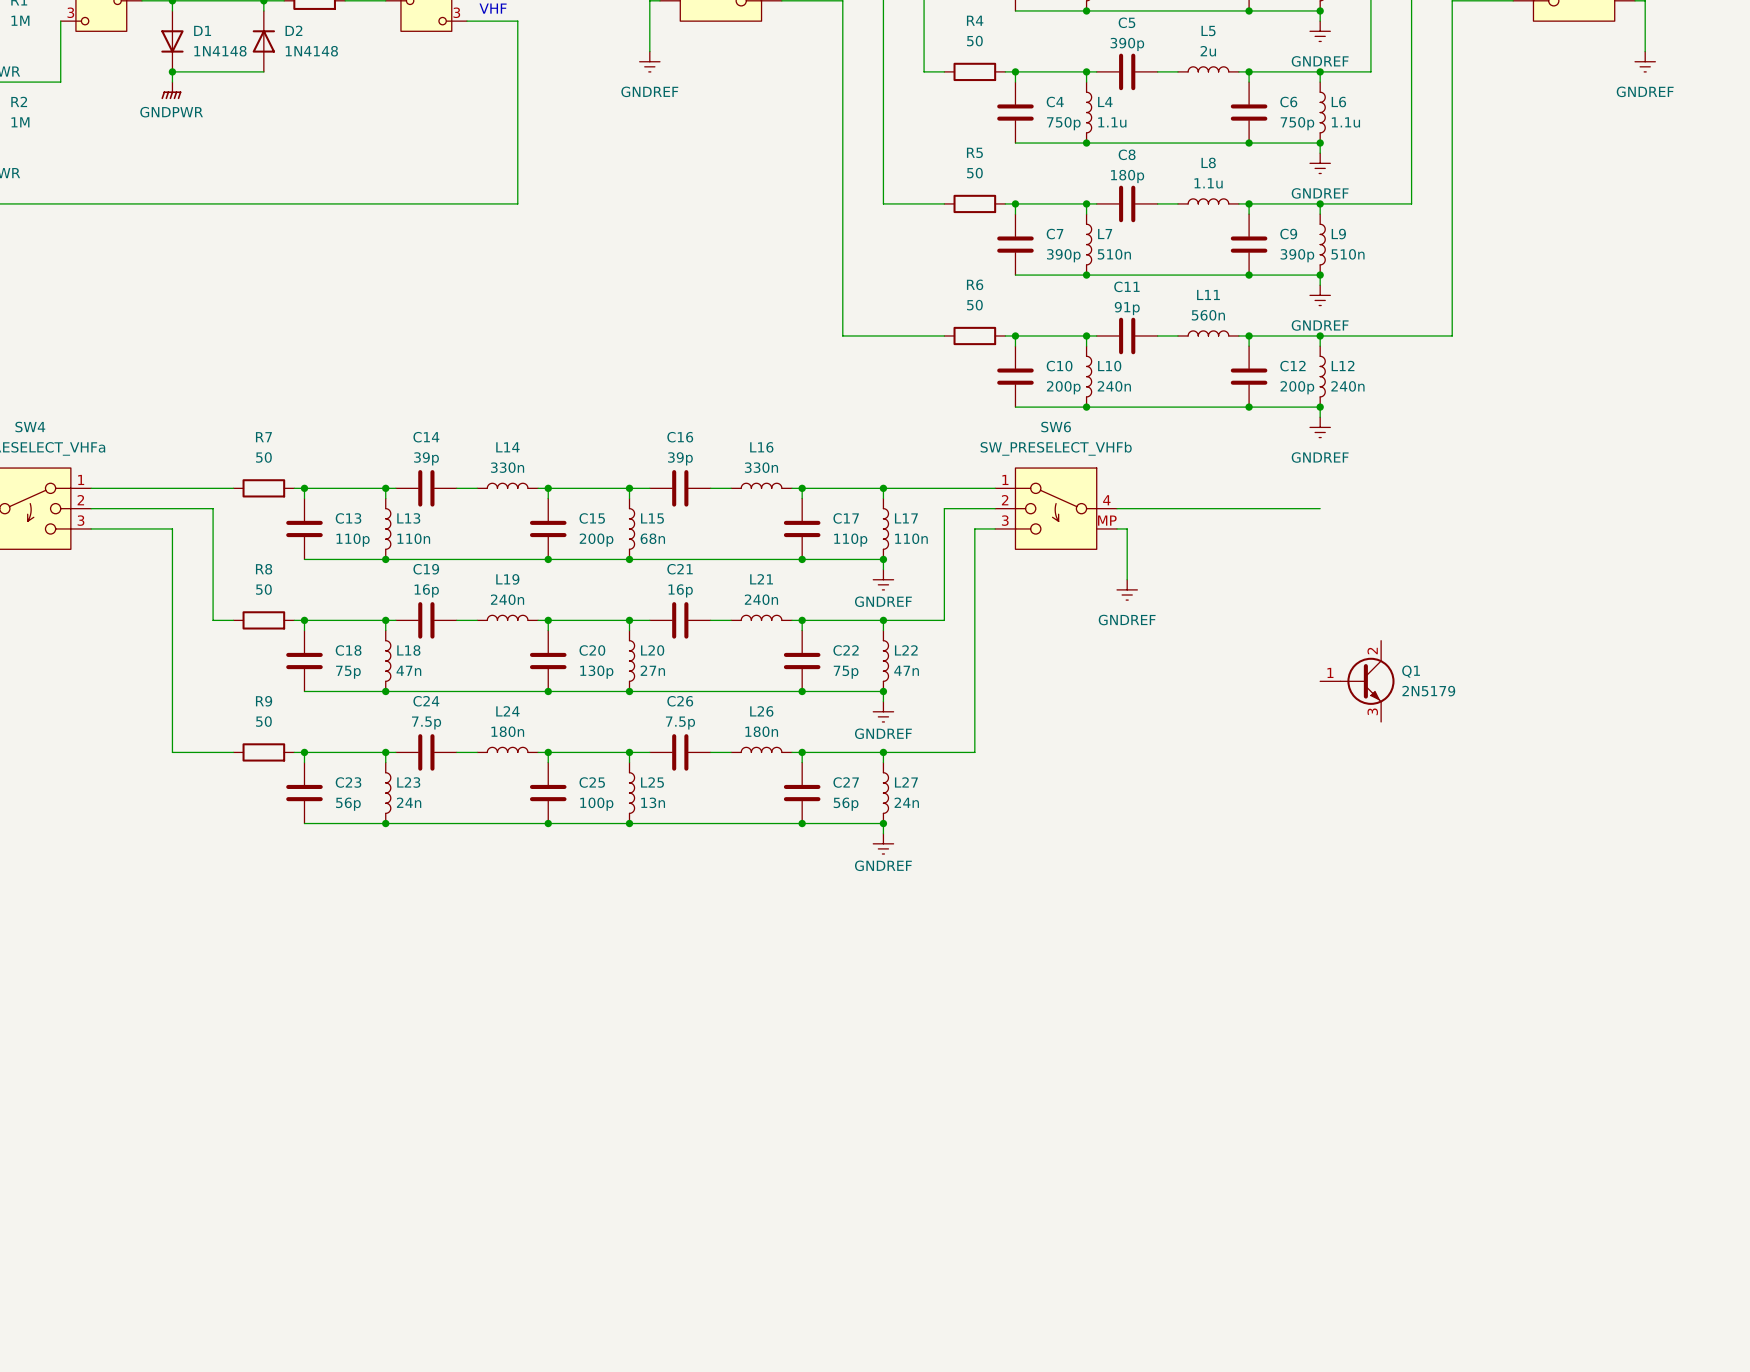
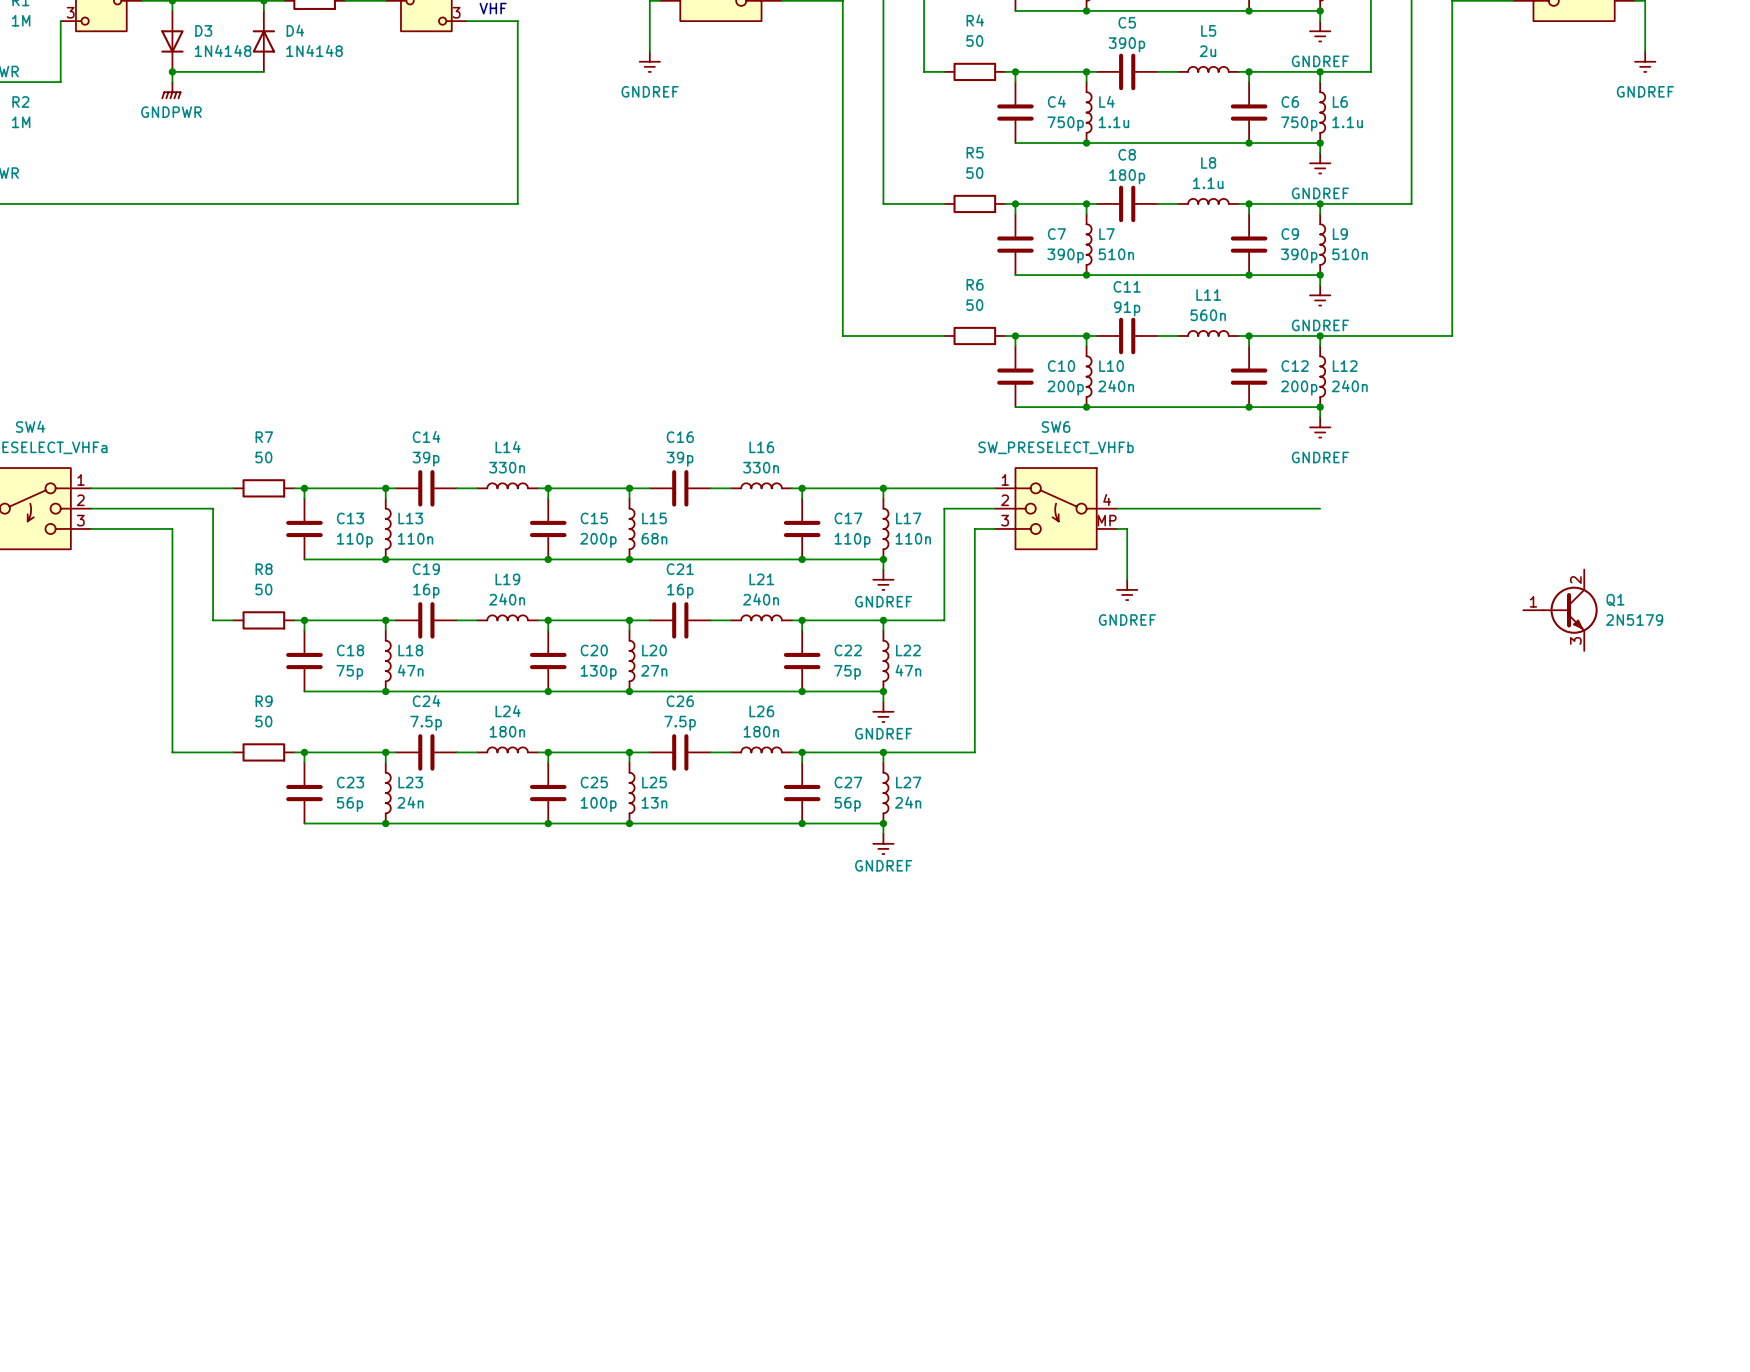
D1 name: D1 (202, 30) -> D3 (203, 30)
D2 name: D2 (293, 30) -> D4 (295, 30)
Q1 position: (1357, 681) -> (1560, 610)

